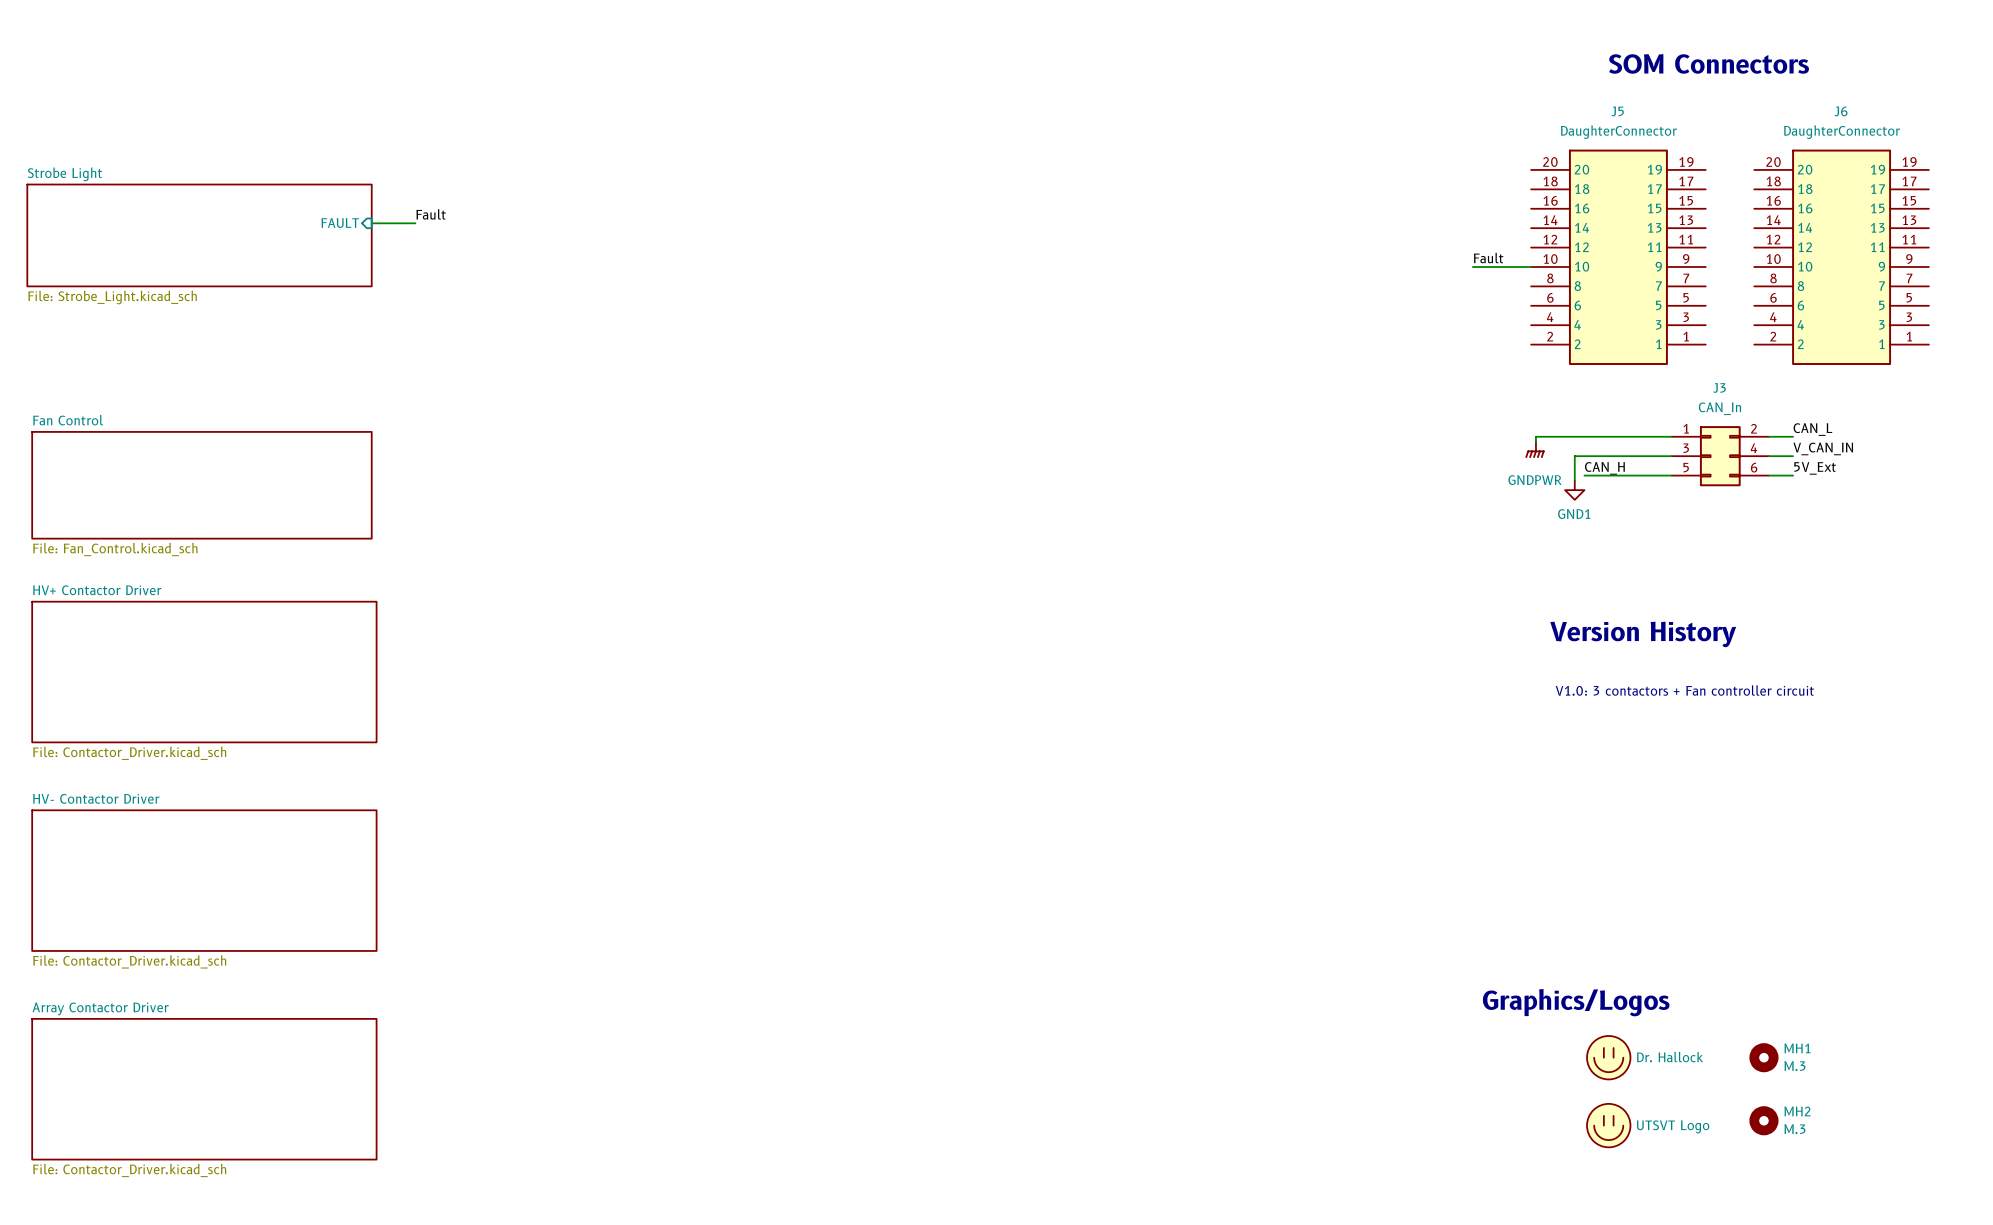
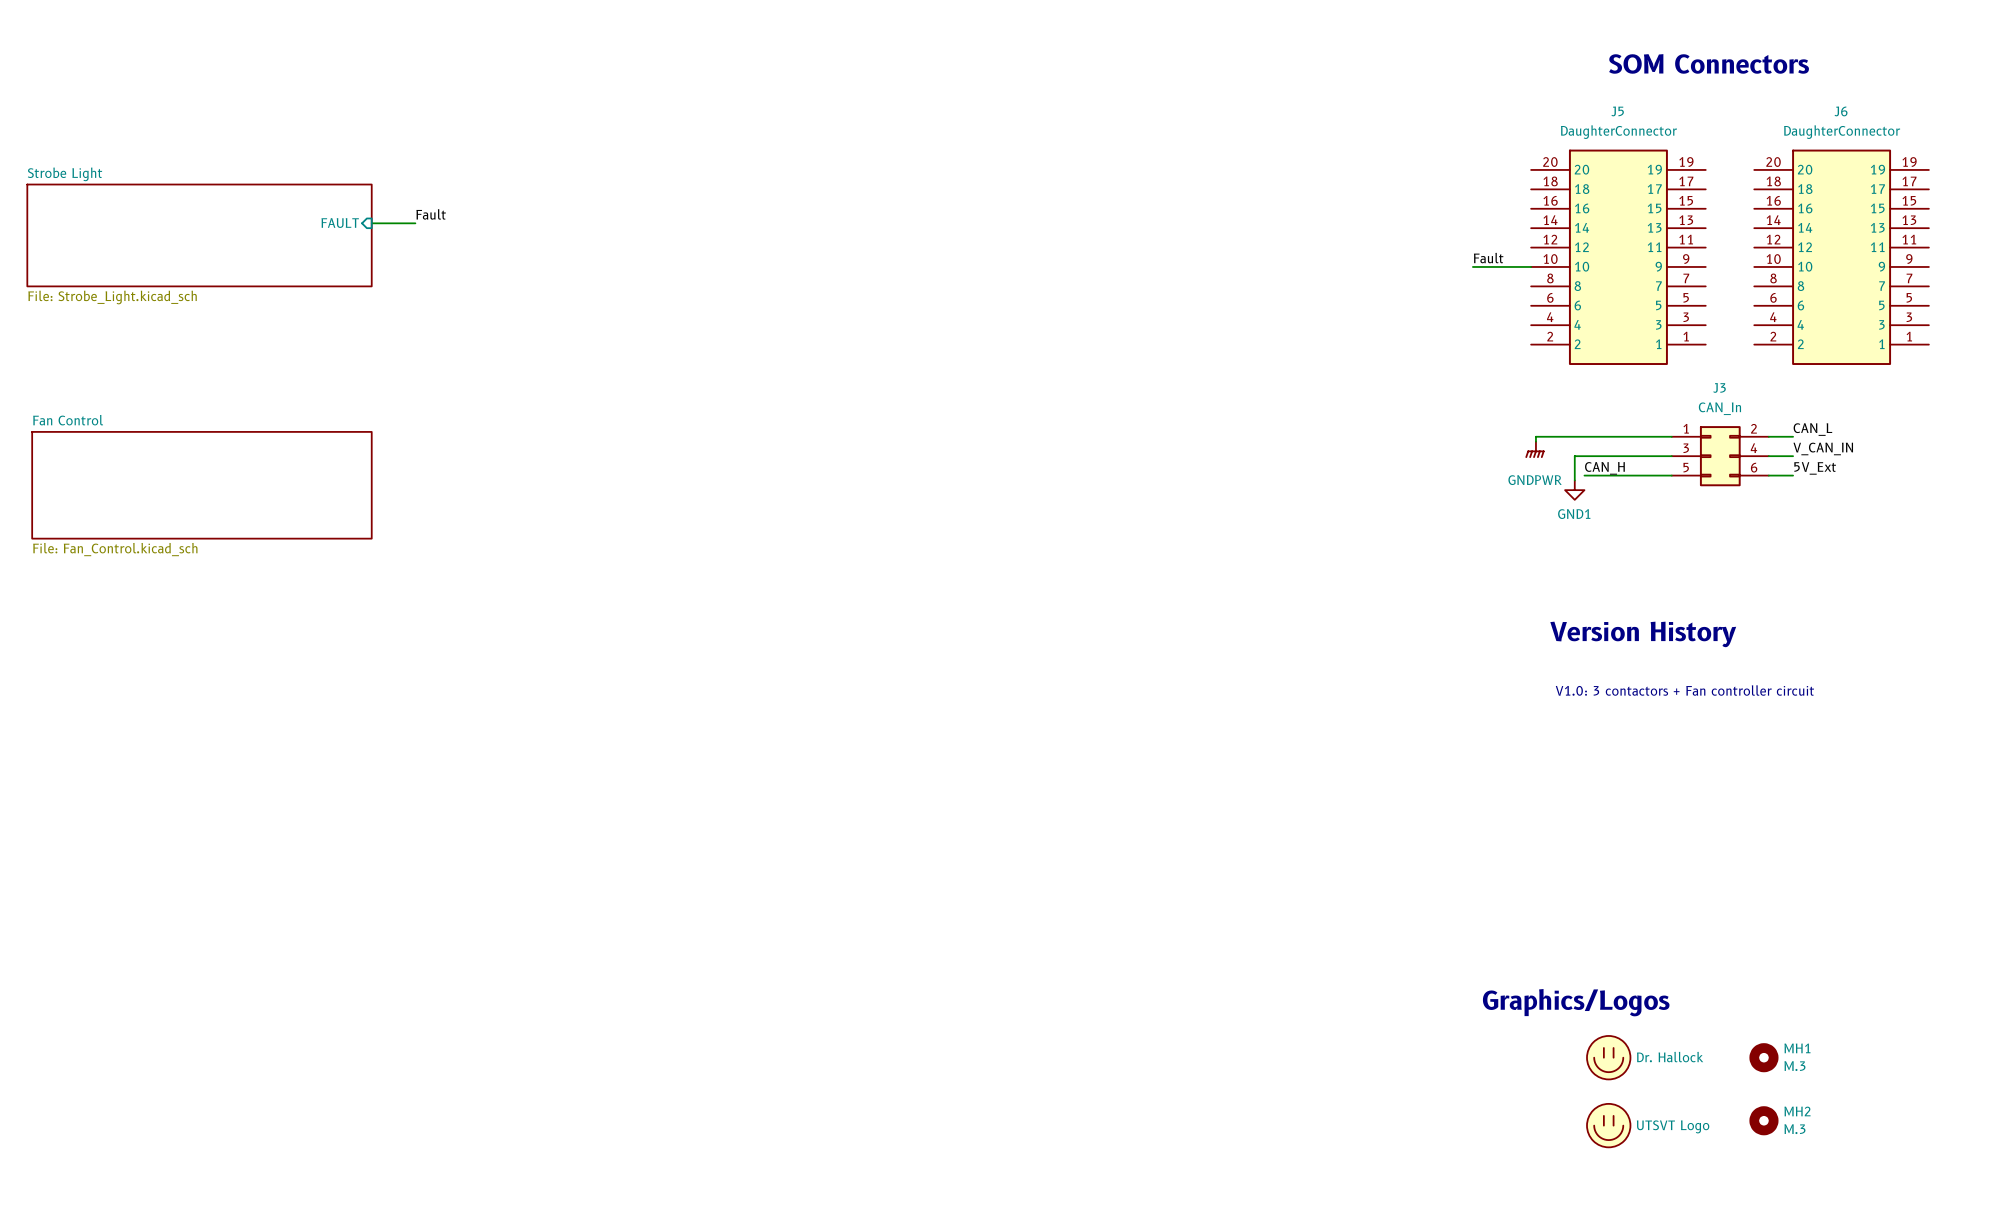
sheet HV+ Contactor Driver: File: Contactor_Driver.kicad_sch (204, 672) -> none
sheet HV- Contactor Driver: File: Contactor_Driver.kicad_sch (204, 880) -> none
sheet Array Contactor Driver: File: Contactor_Driver.kicad_sch (204, 1089) -> none

